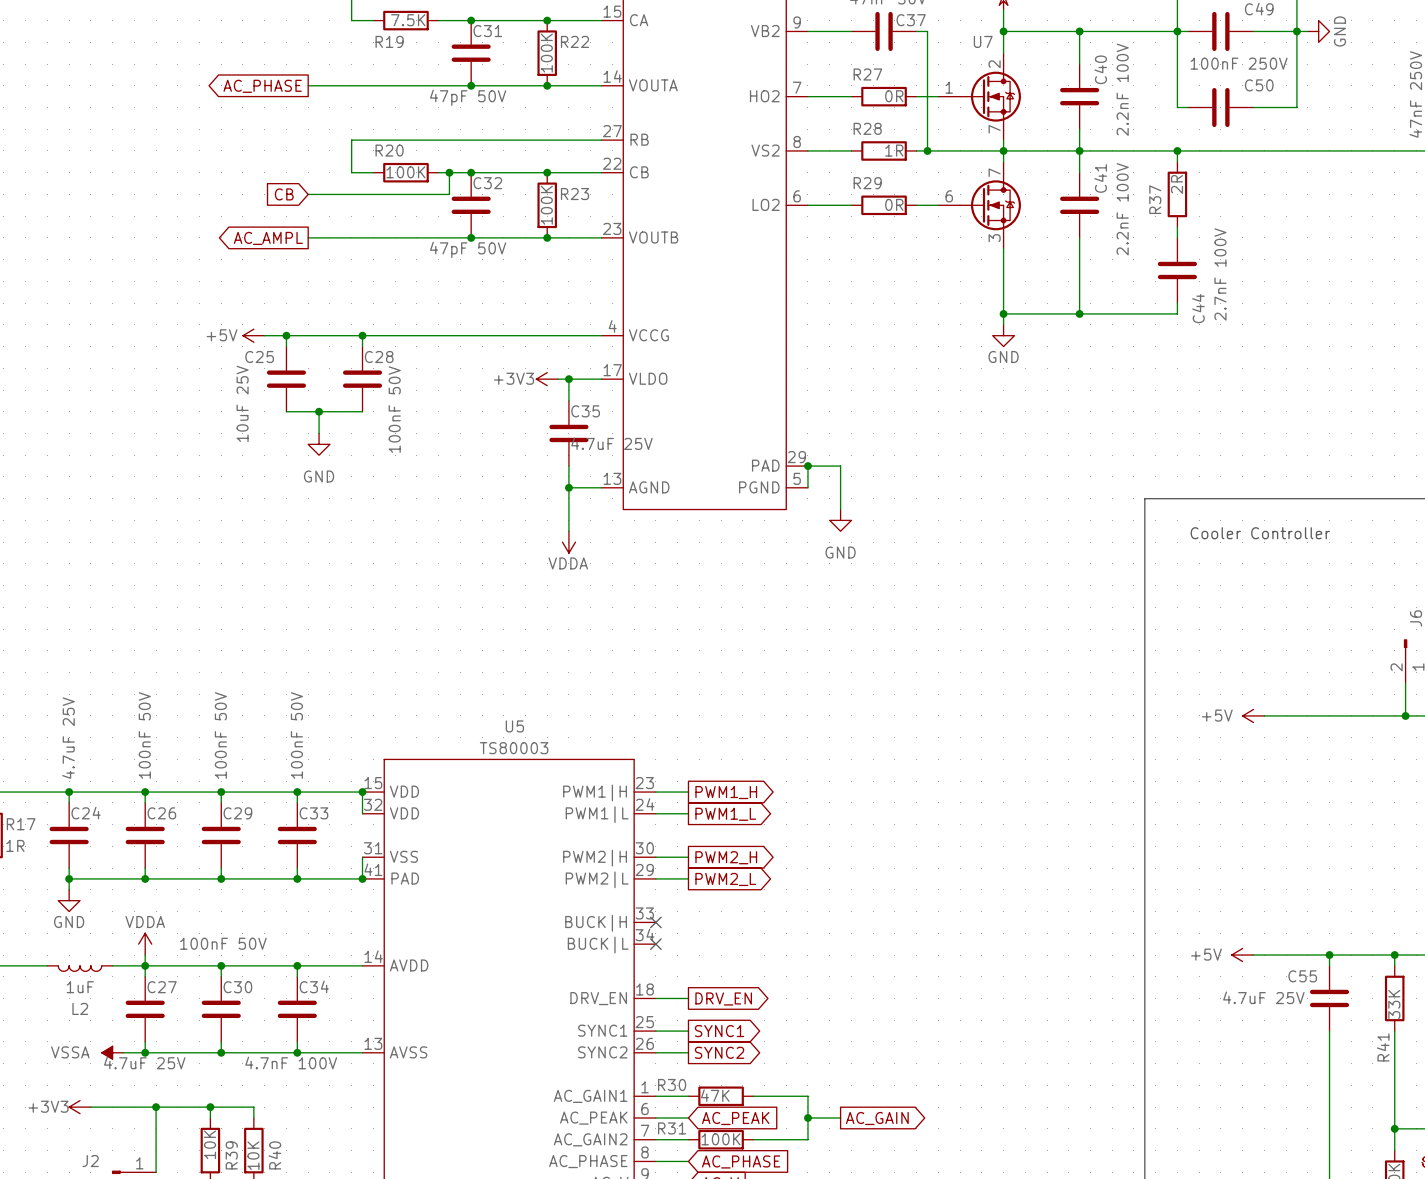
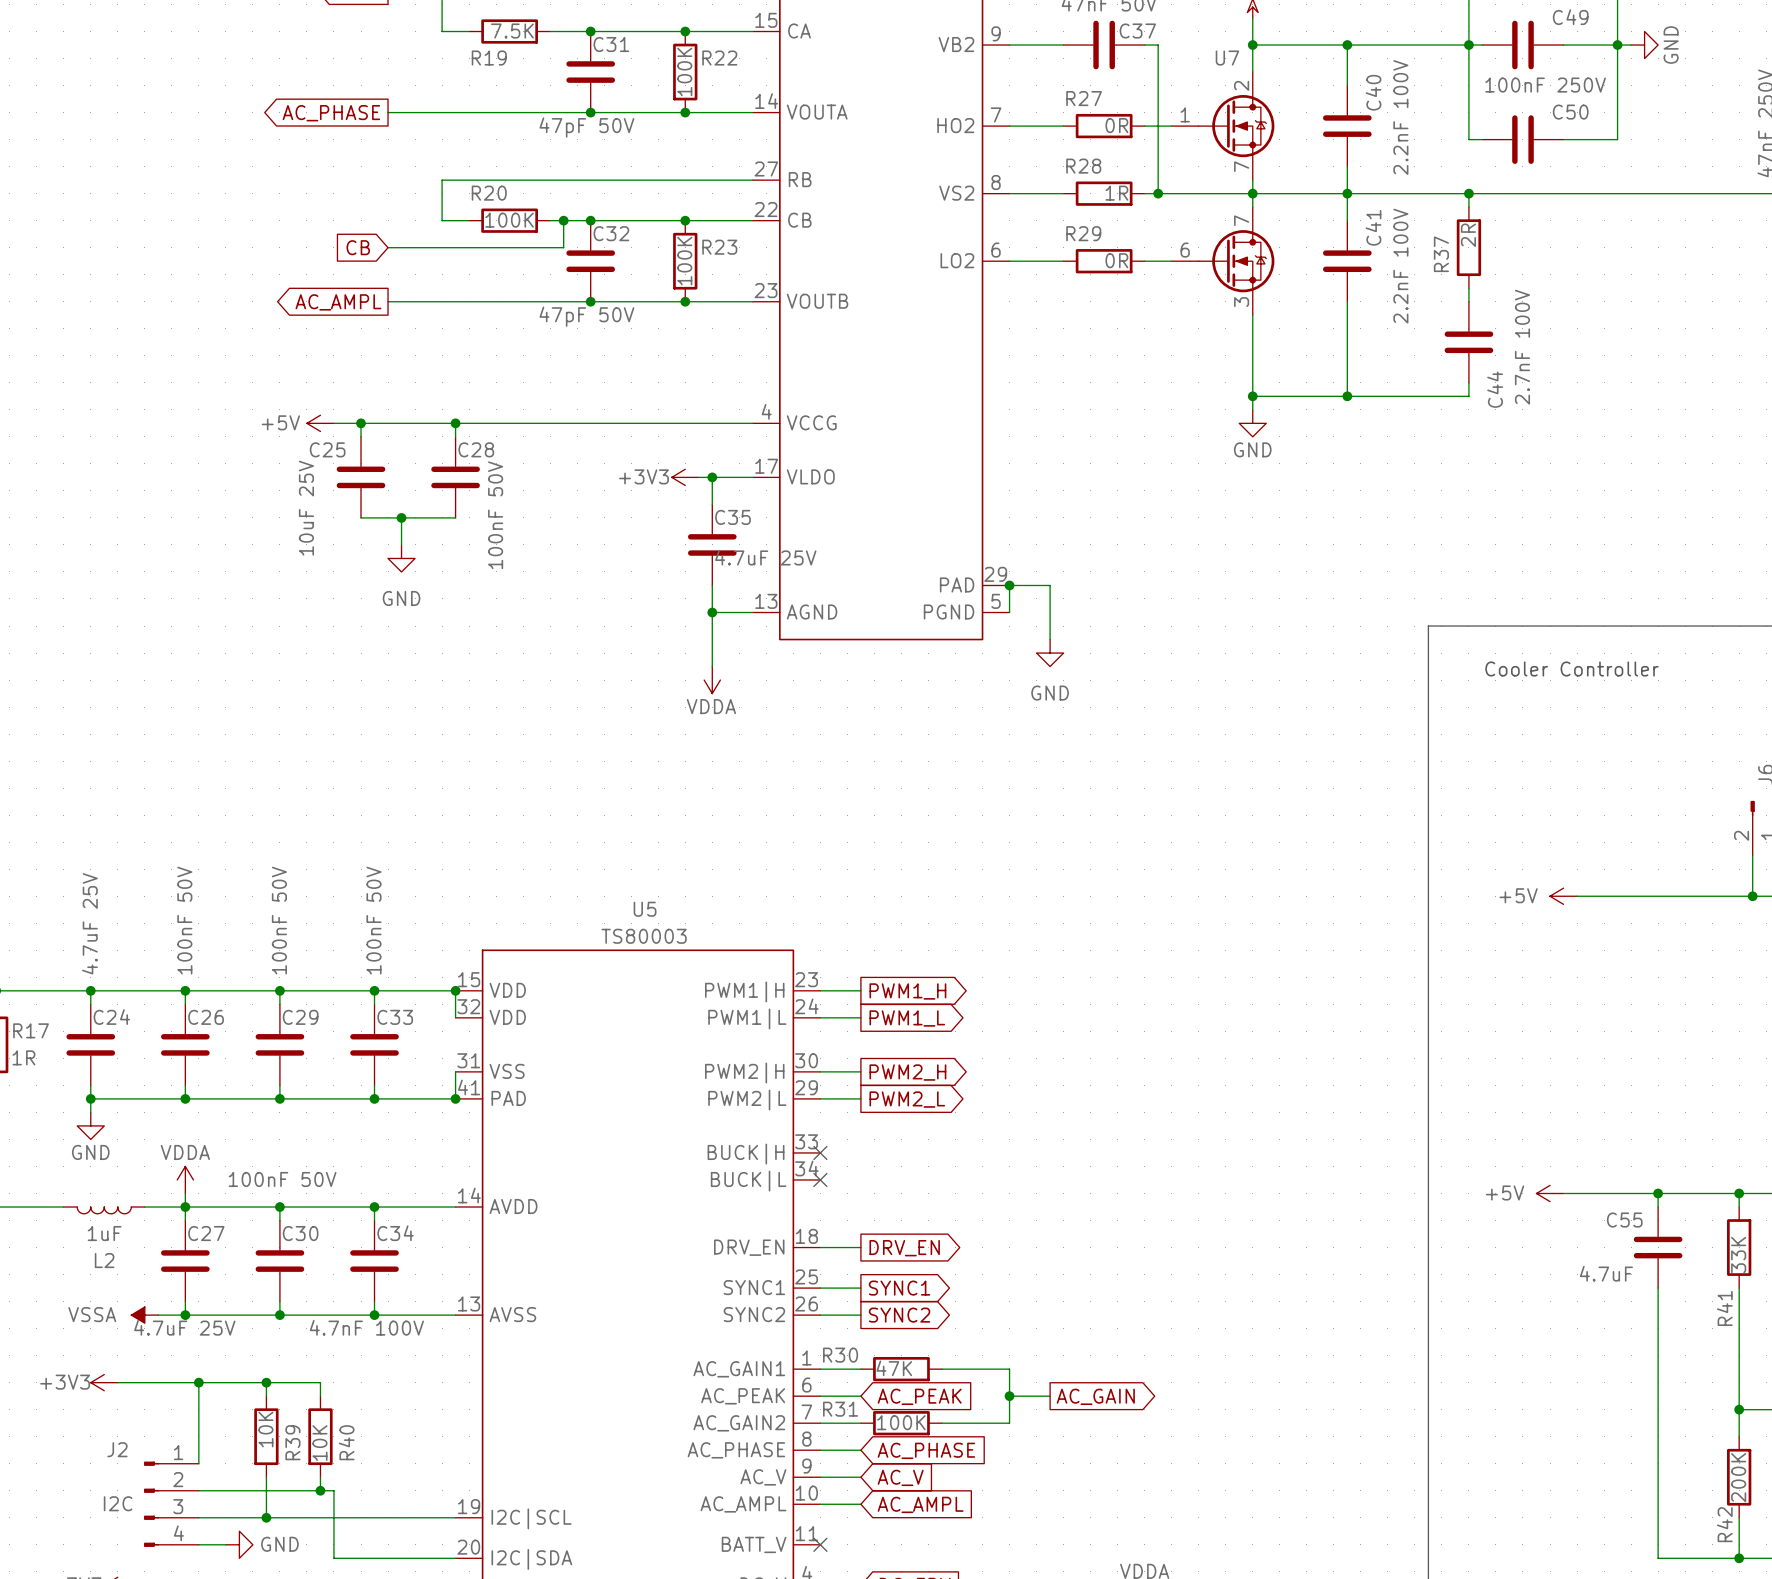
C55 value: 4.7uF 25V (1263, 997) -> 4.7uF (1606, 1273)

